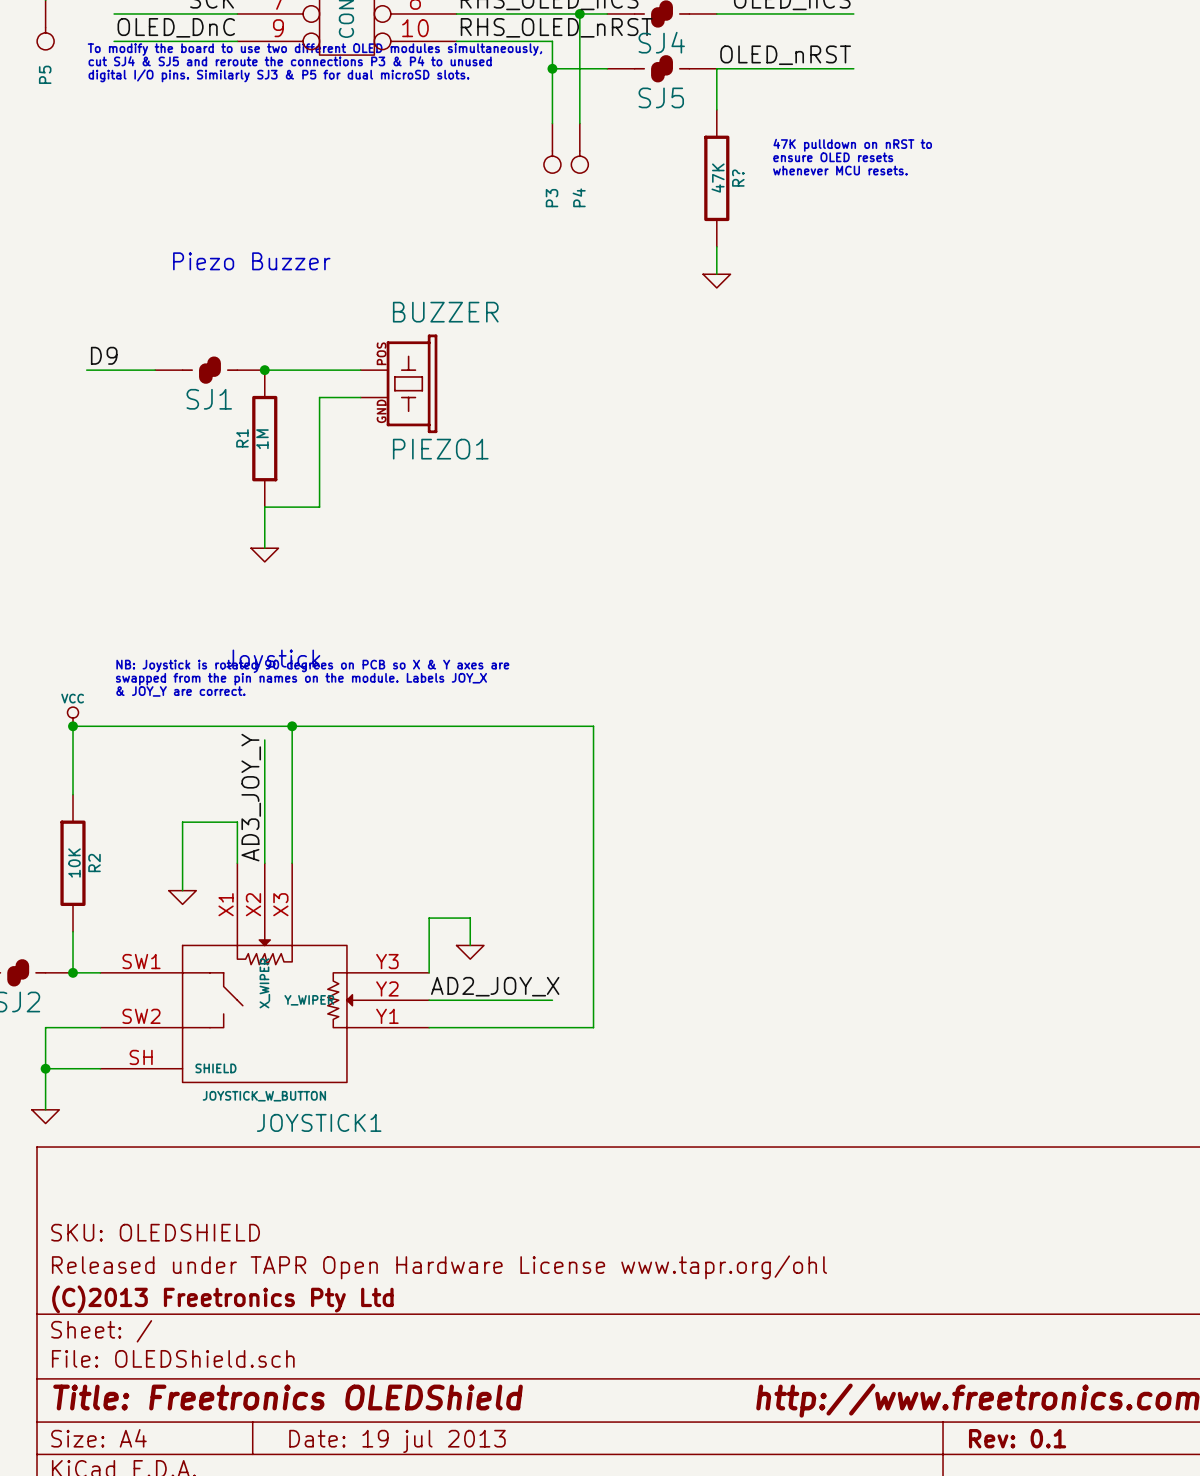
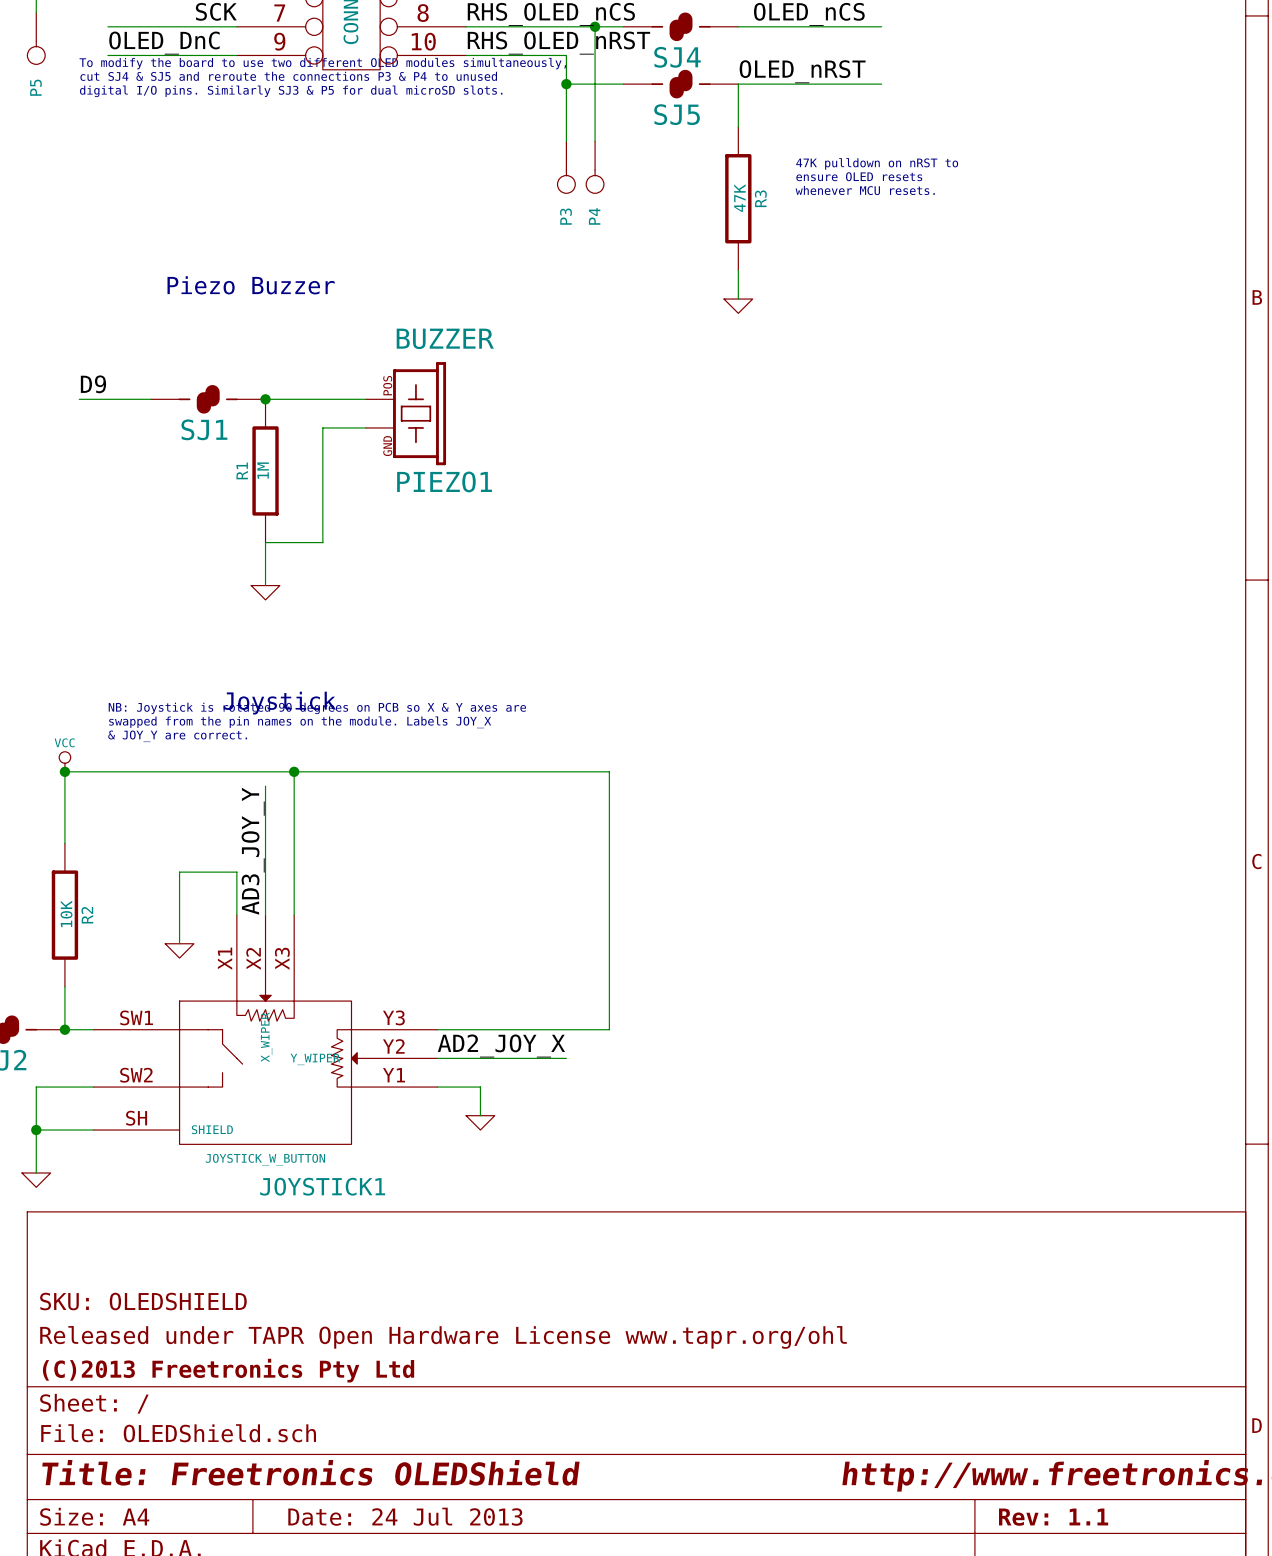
R? name: R? (738, 178) -> R3 (760, 198)
wire: (470, 945) (470, 918) (429, 918) (429, 972) -> none
power symbol position: (470, 952) -> (480, 1122)
wire: (593, 972) (593, 1027) (470, 1027) -> (609, 1029) (437, 1029)
wire: none -> (480, 1087) (480, 1115)
title block: Rev: 0.1 (1017, 1438) -> Rev: 1.1 (1053, 1517)
title block: Date: 19 jul 2013 (397, 1441) -> Date: 24 Jul 2013 (405, 1516)

